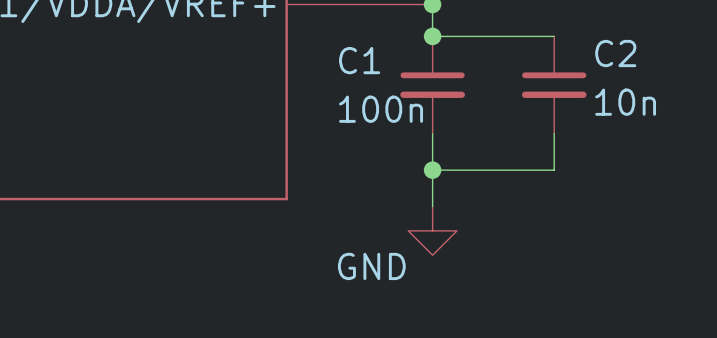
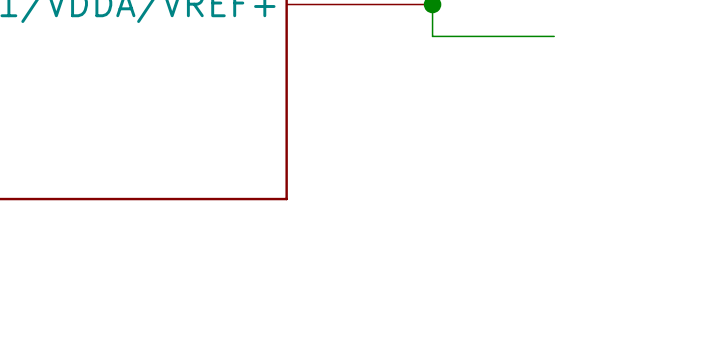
junction: (432, 36) -> none
C1: 100n (432, 85) -> none
C2: 10n (554, 85) -> none
wire: (432, 133) (432, 206) -> none
wire: (554, 133) (554, 170) (432, 170) -> none
junction: (432, 170) -> none
power symbol: GND (432, 230) -> none

